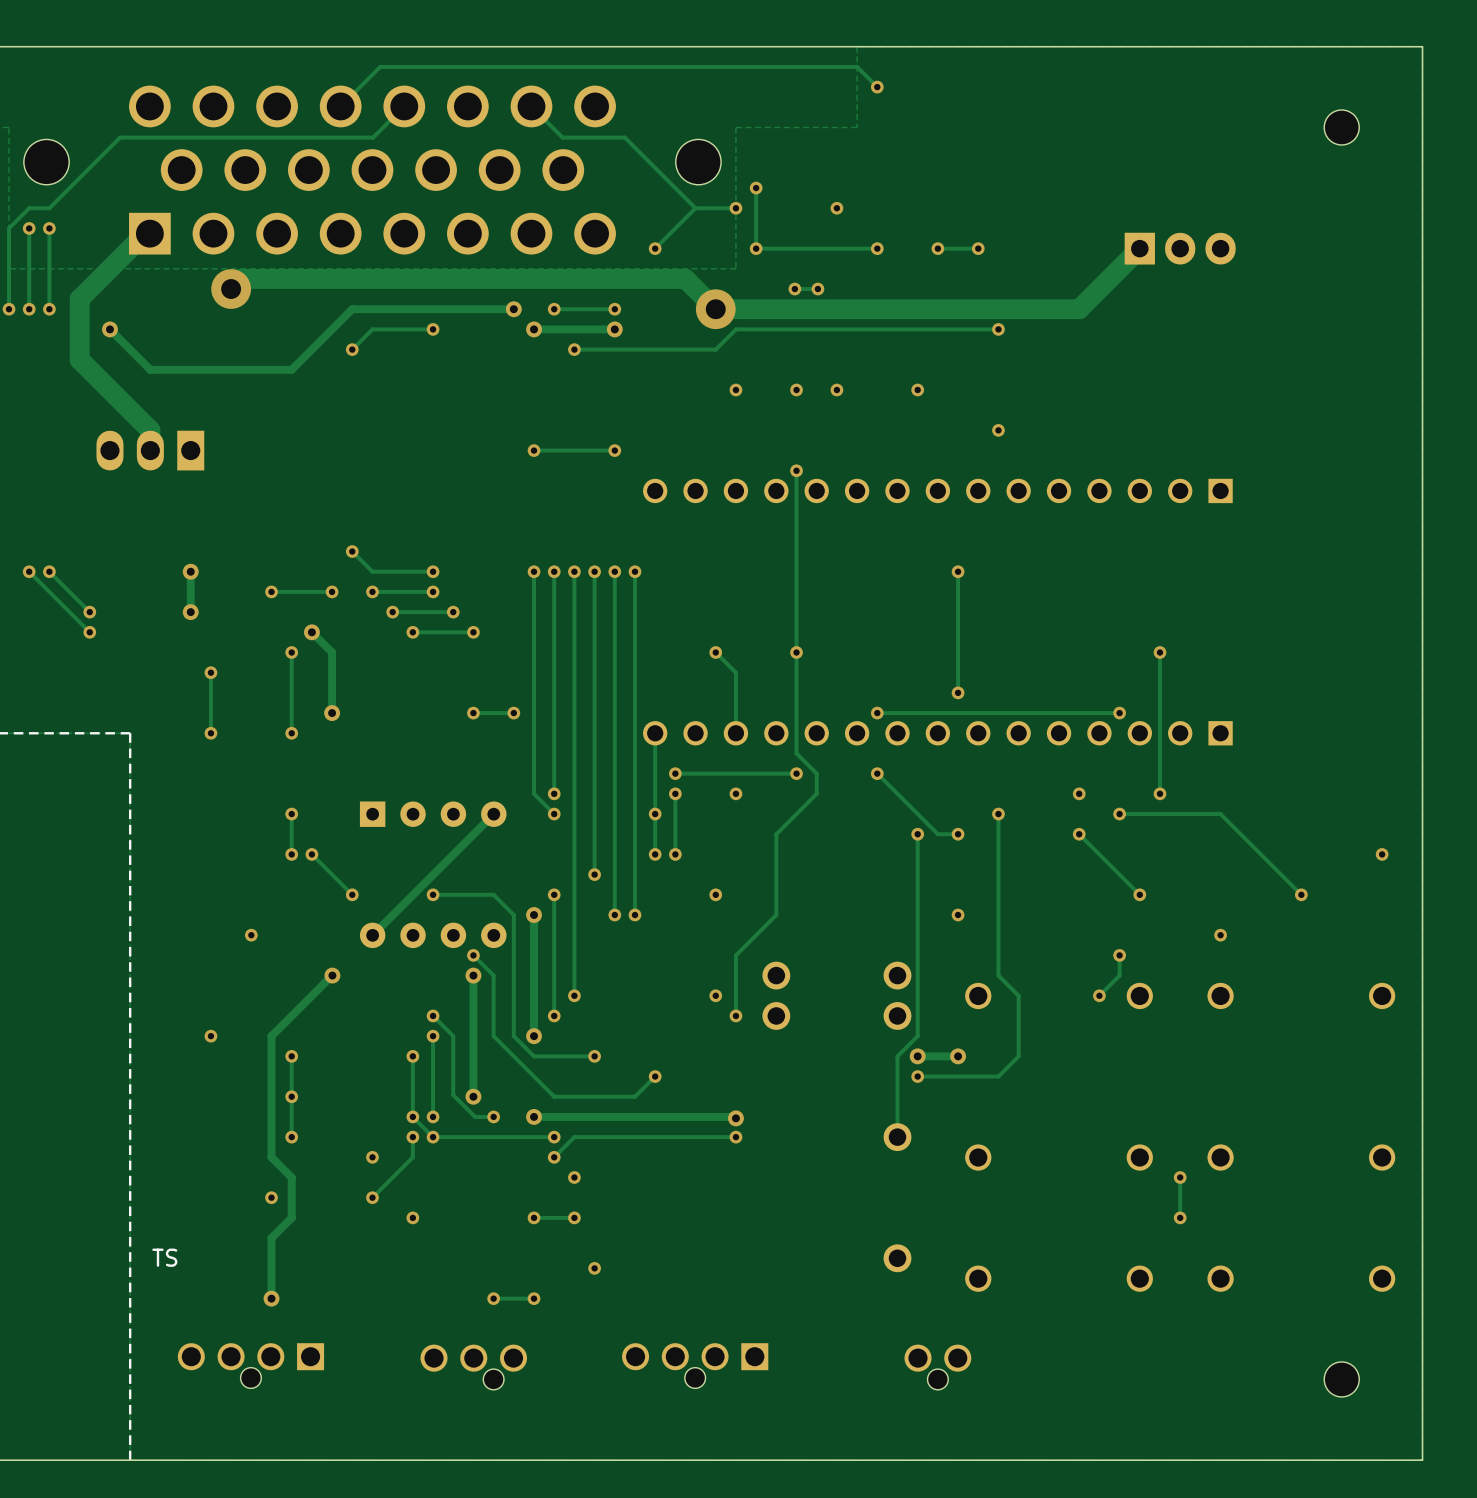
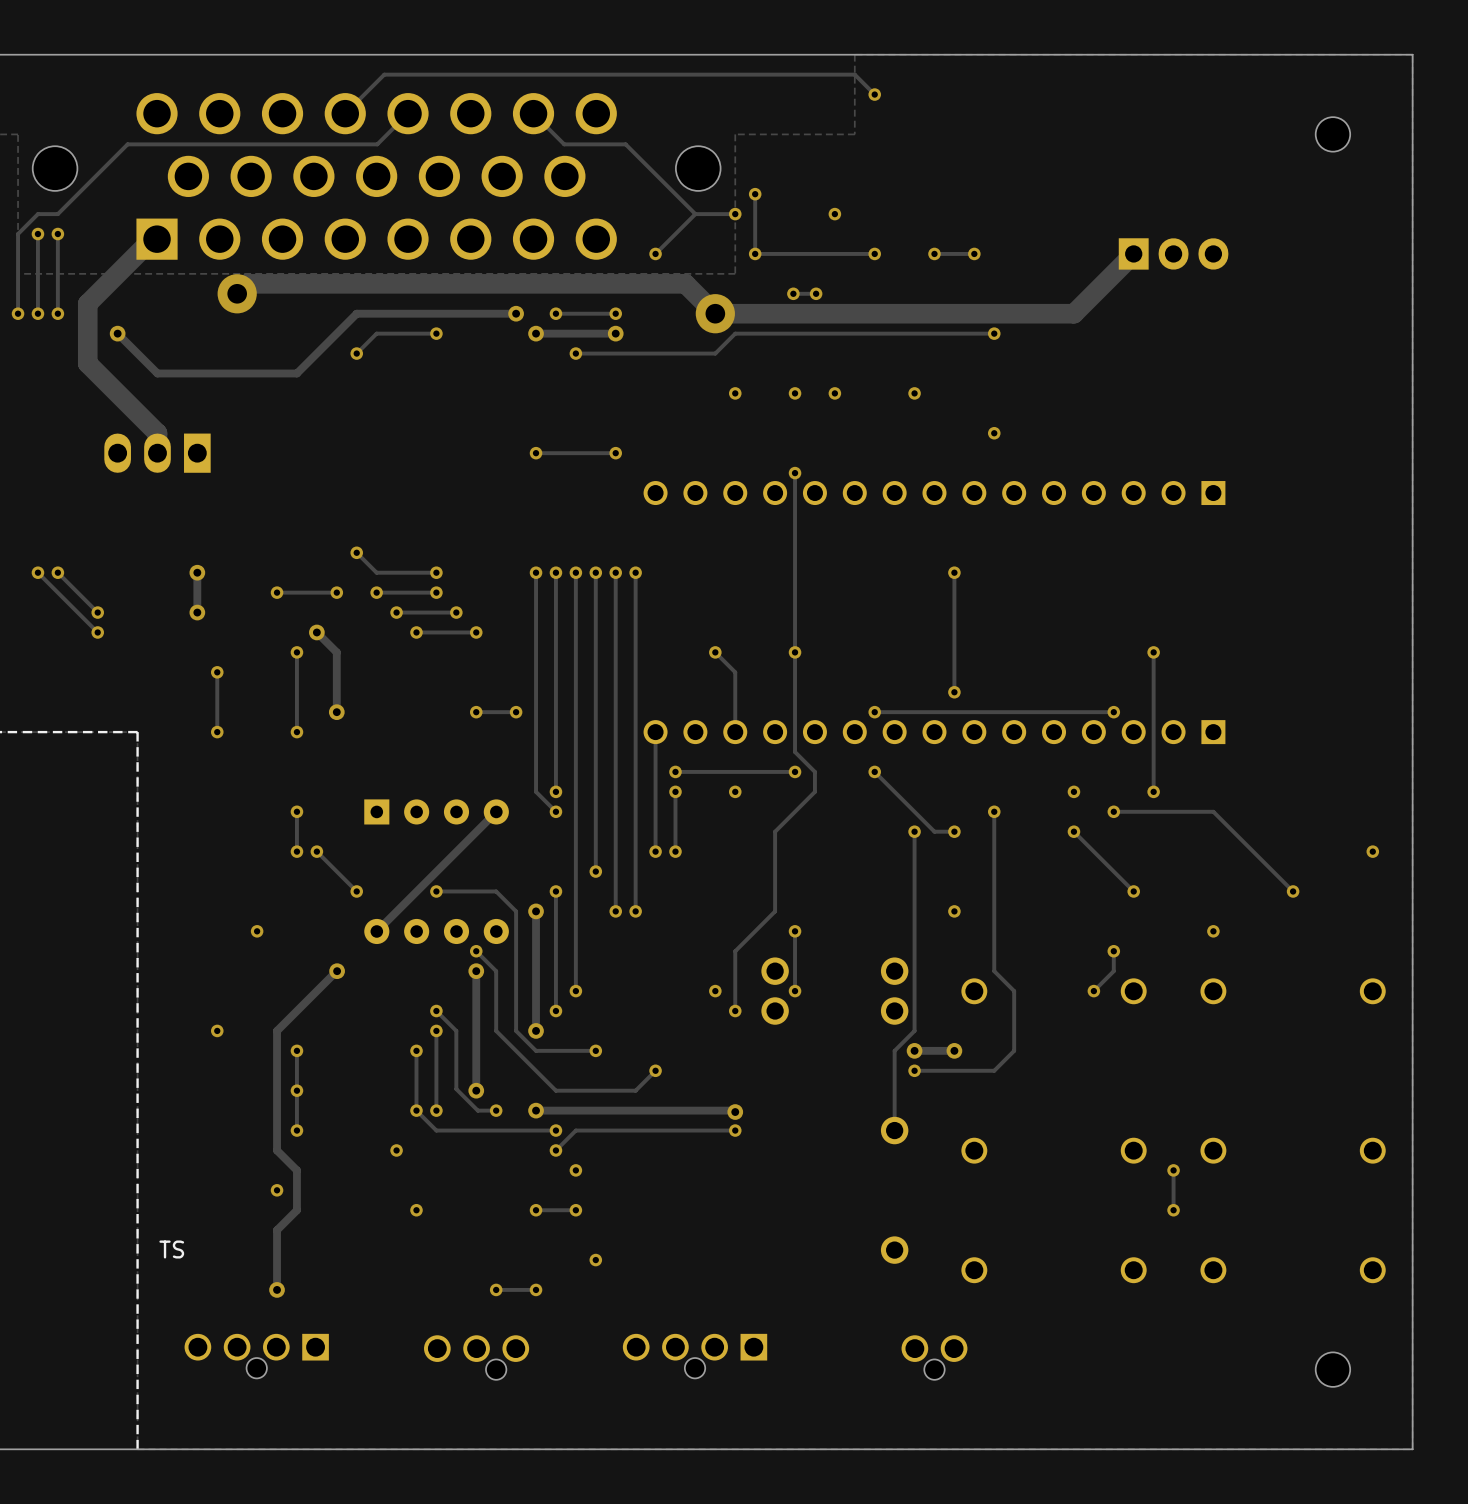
via: (655, 814) -> none
via: (715, 894) -> none
track: none -> (795, 931) (795, 991)
via: none -> (795, 931)
via: none -> (795, 991)
track: (412, 1137) (412, 1157) (372, 1197) -> none
via: (412, 1137) -> none
via: (433, 1137) -> none
via: (372, 1157) -> none
via: none -> (396, 1150)
via: (372, 1197) -> none

